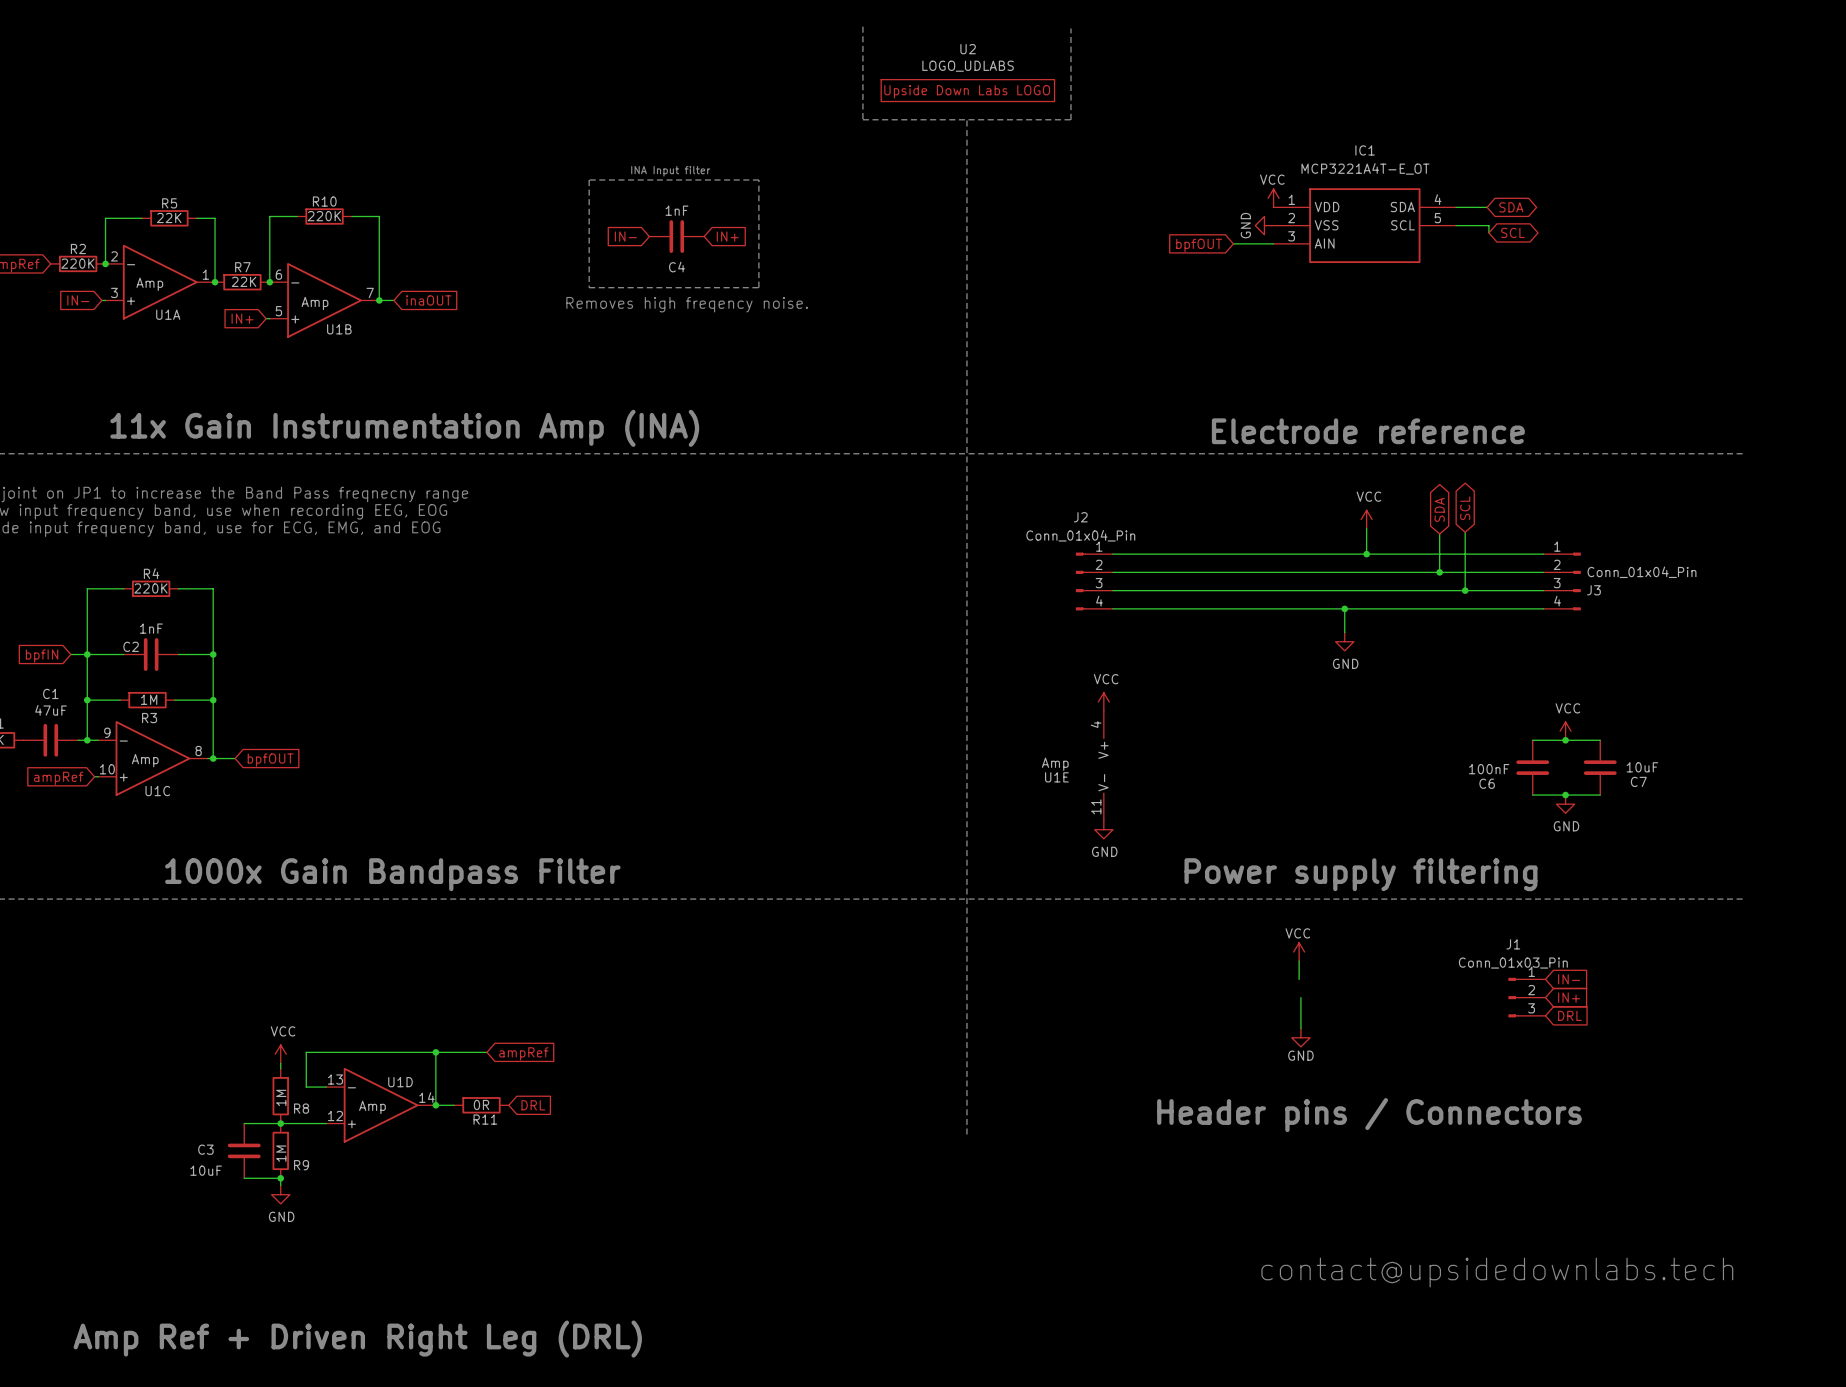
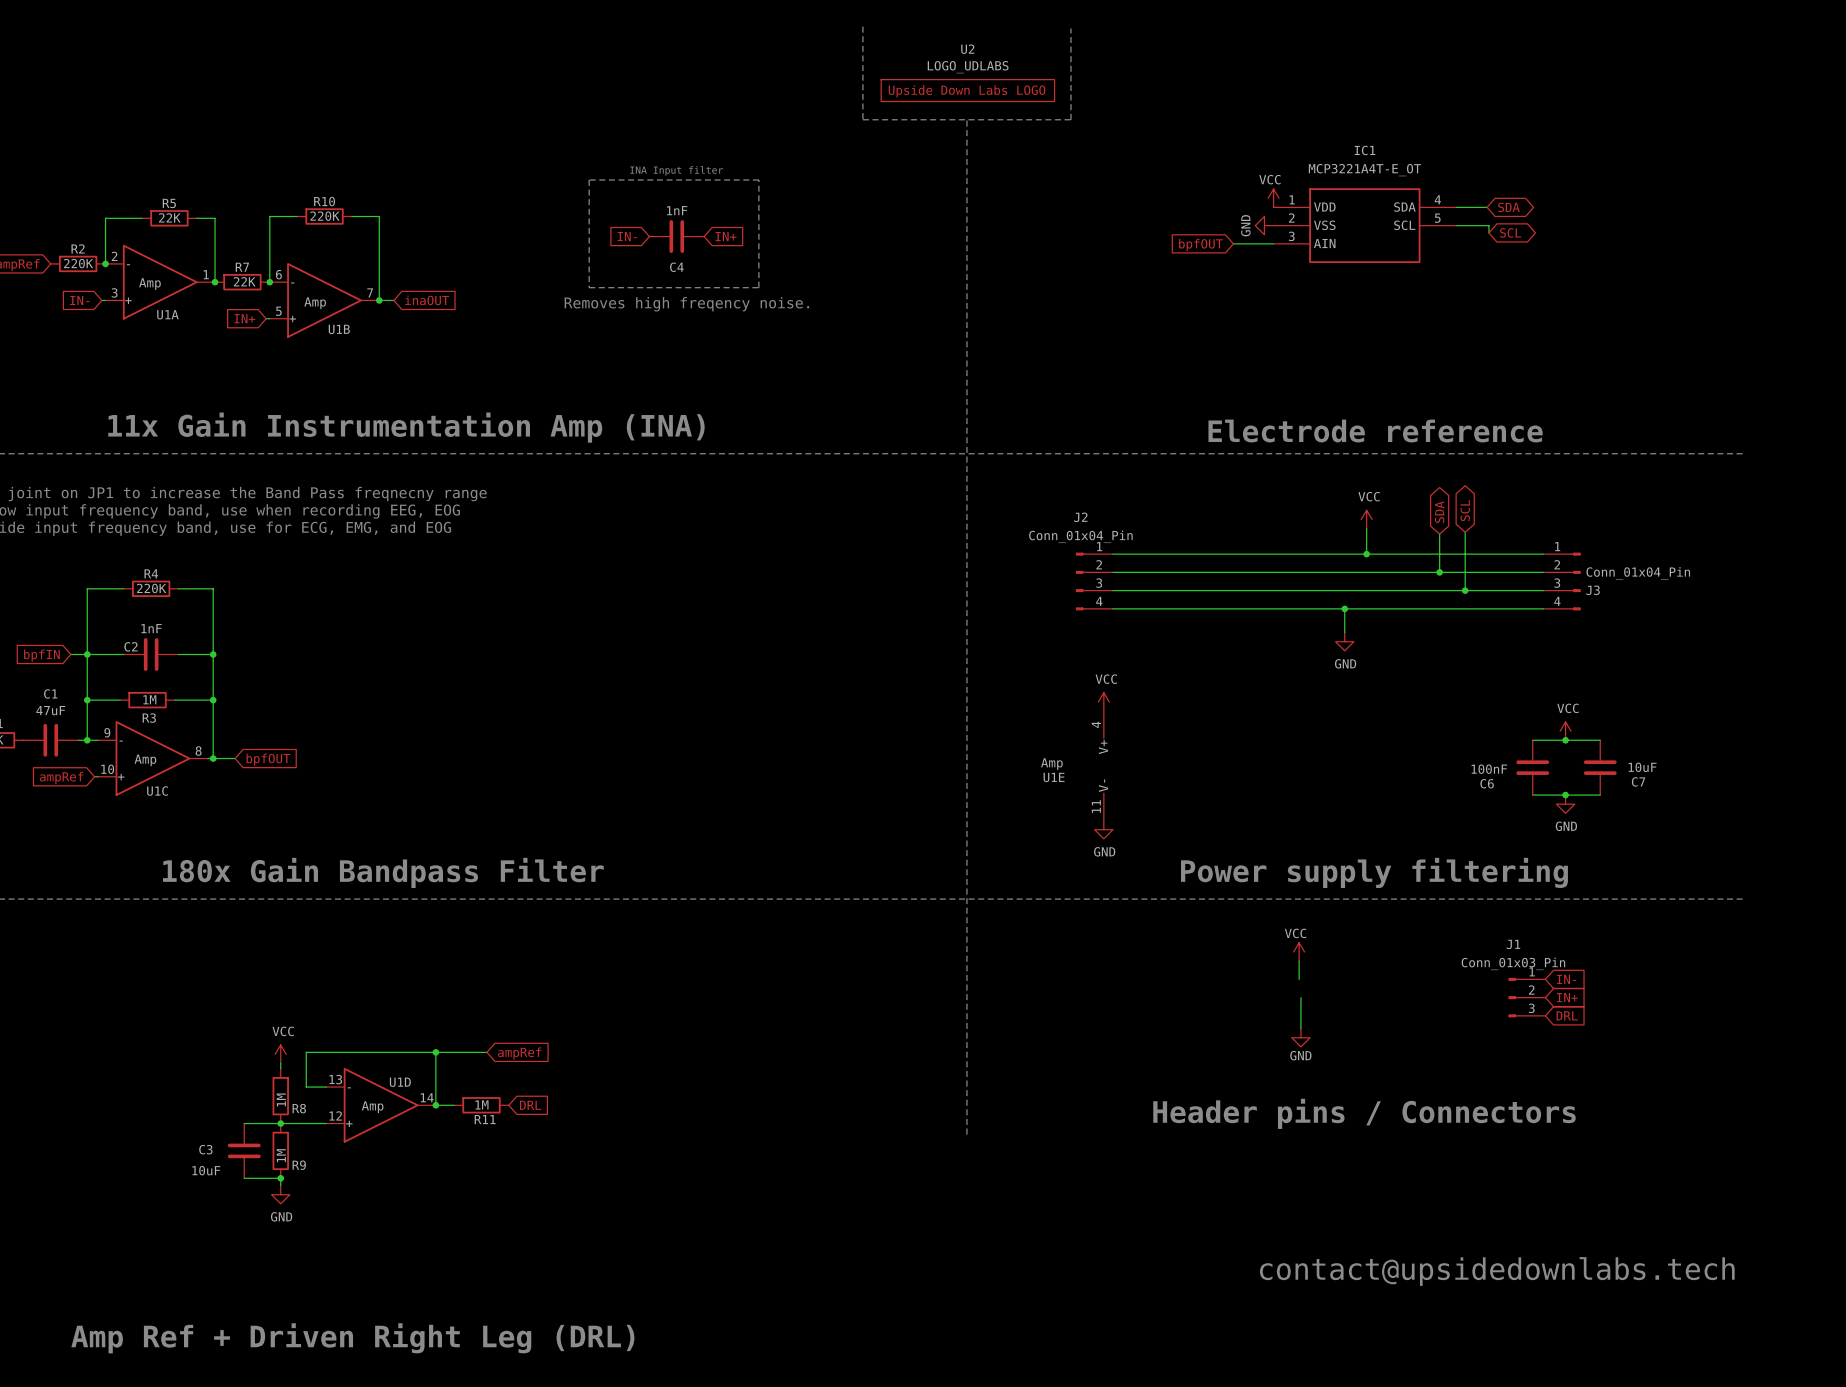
text: 1000x Gain Bandpass Filter (392, 874) -> 180x Gain Bandpass Filter (383, 872)
R11 value: 0R (481, 1104) -> 1M (481, 1104)

